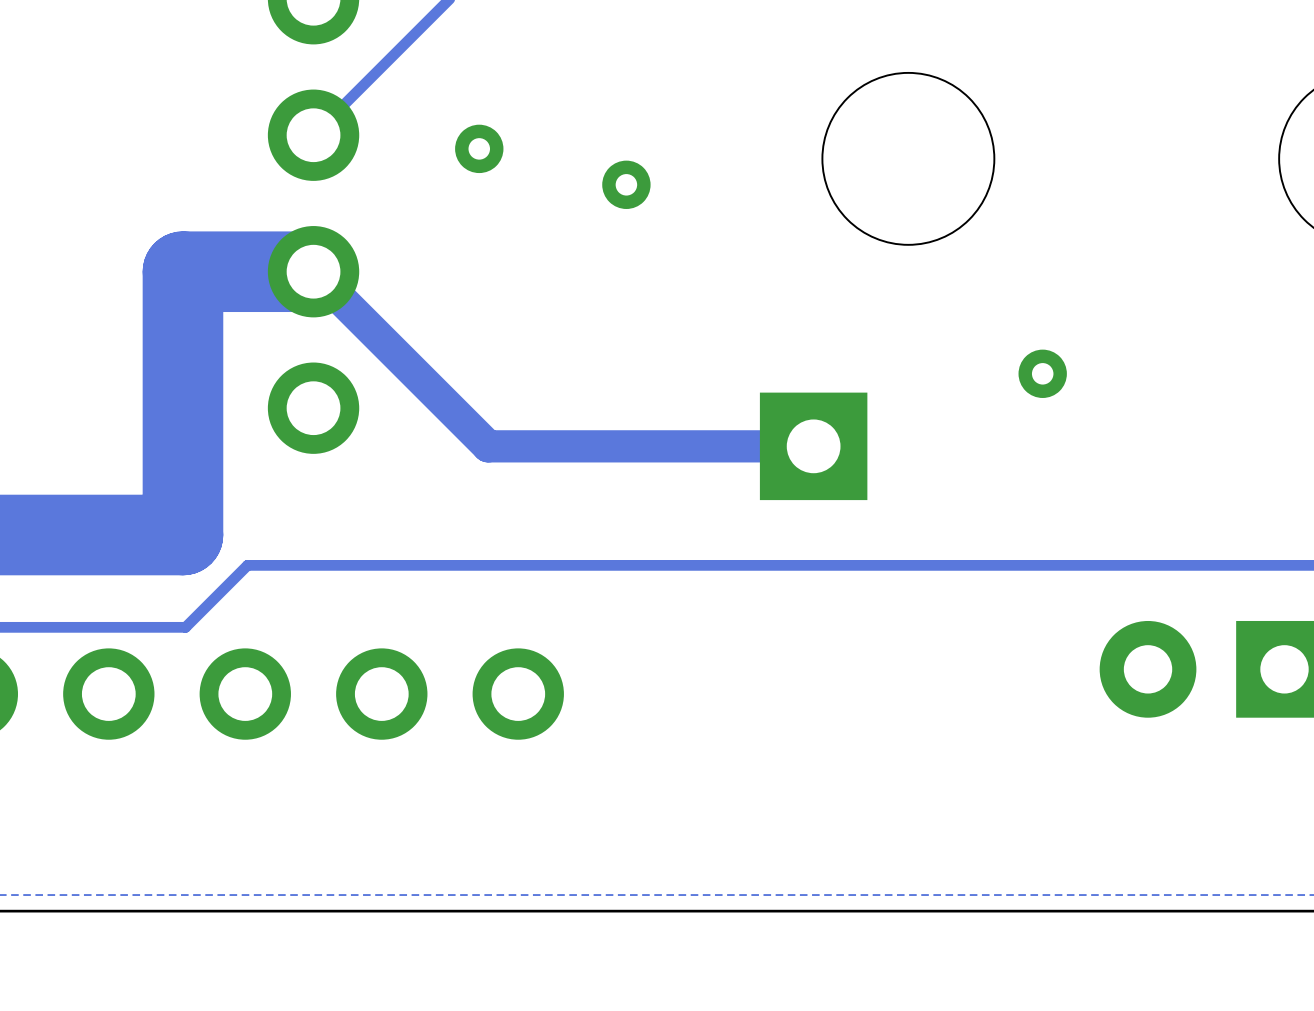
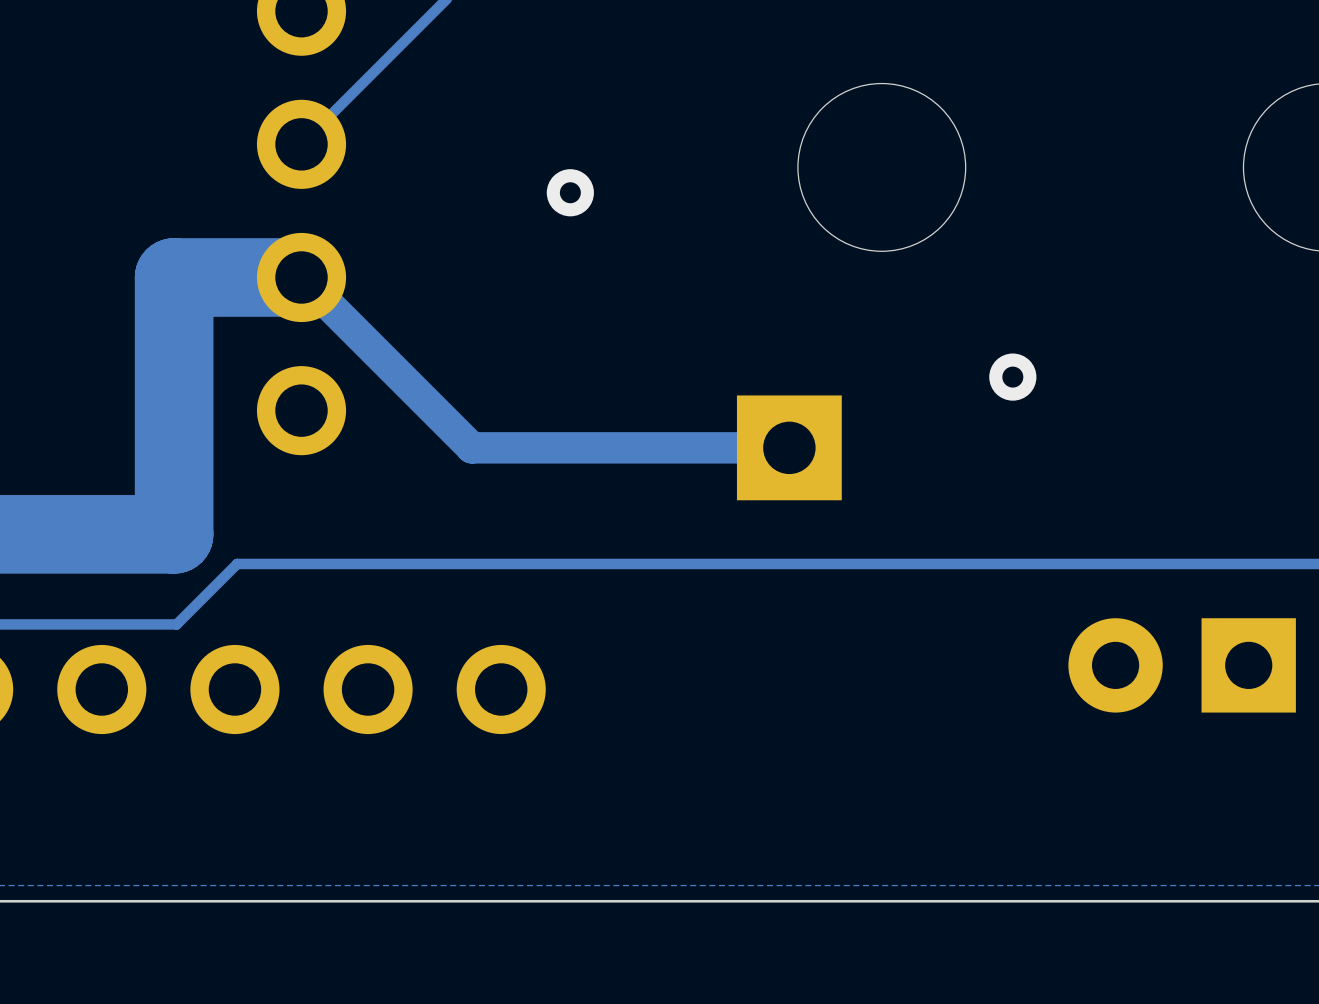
via: (479, 148) -> none
via position: (626, 184) -> (570, 192)

